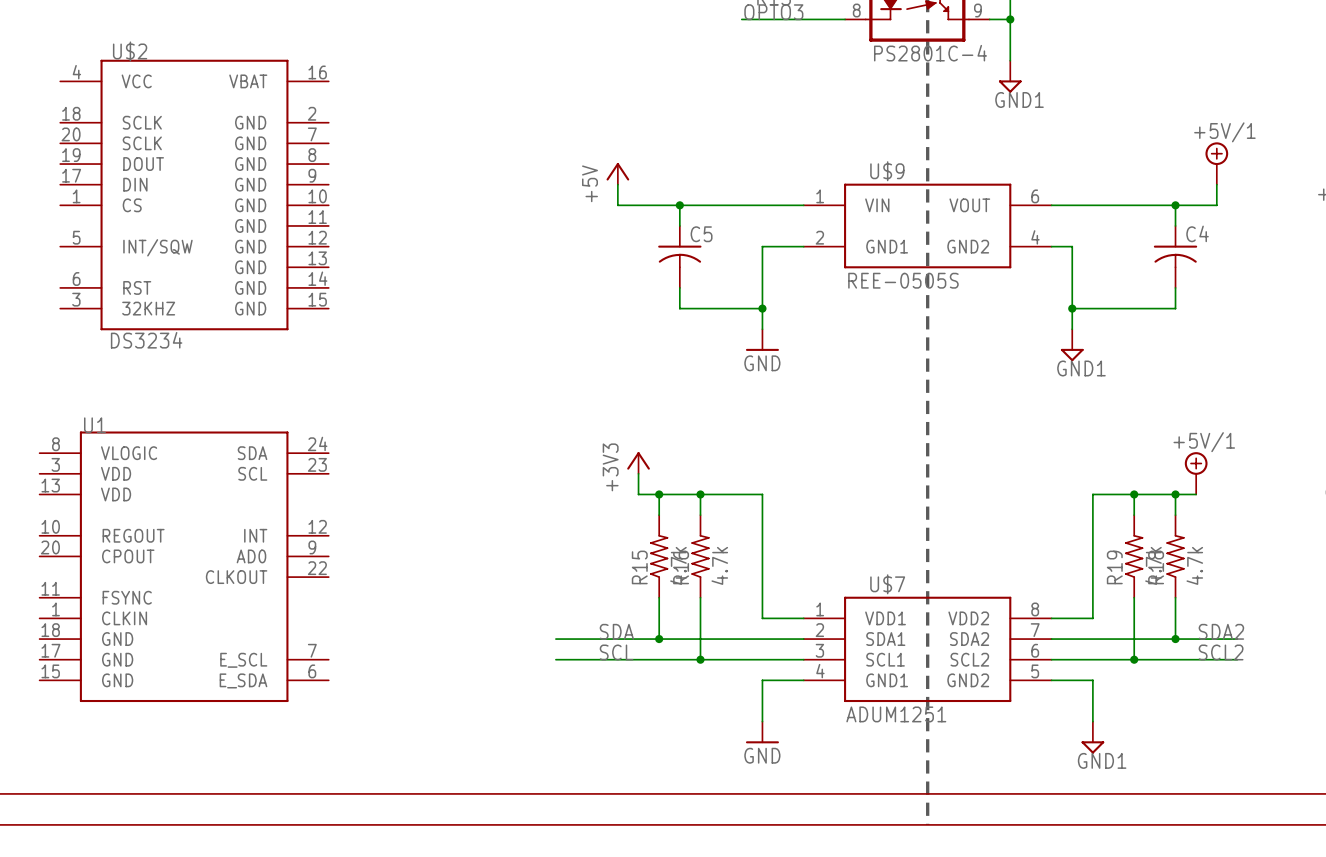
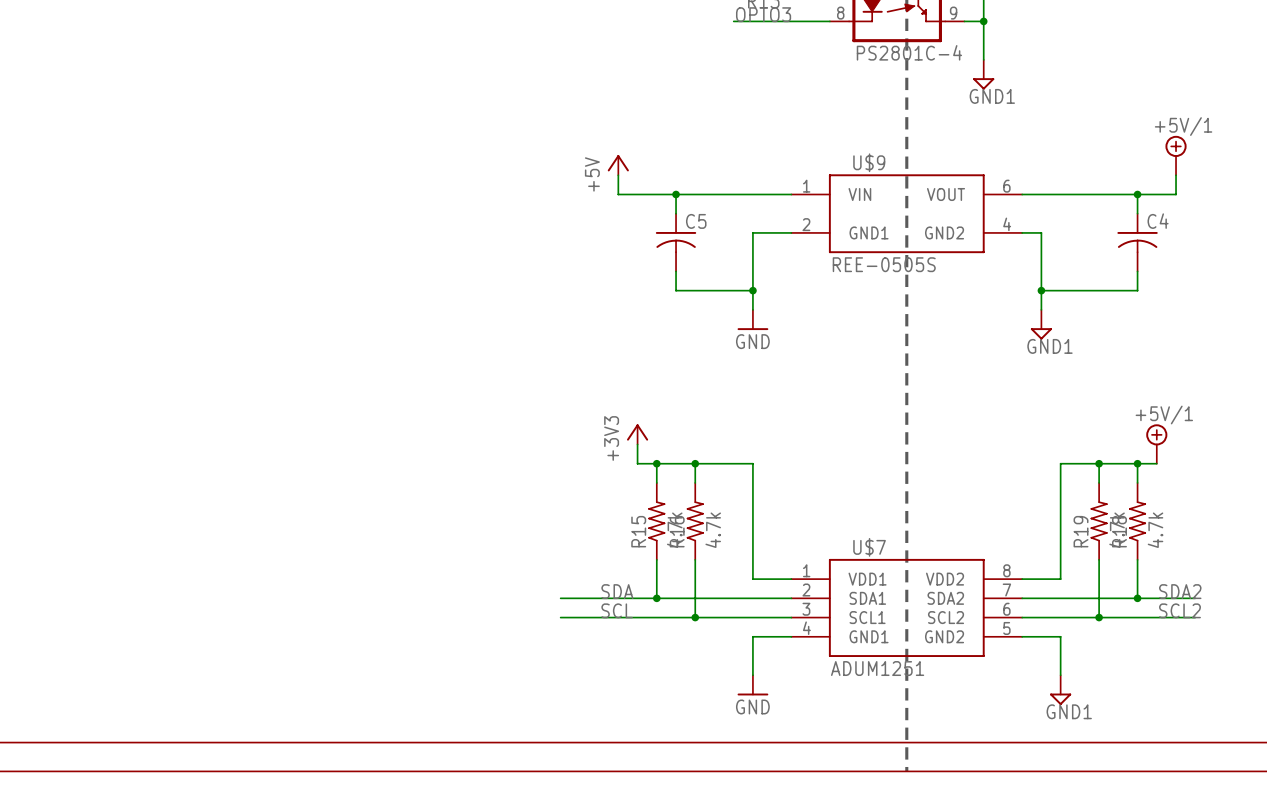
U$2: DS3234 (194, 195) -> none
U1: (184, 566) -> none

